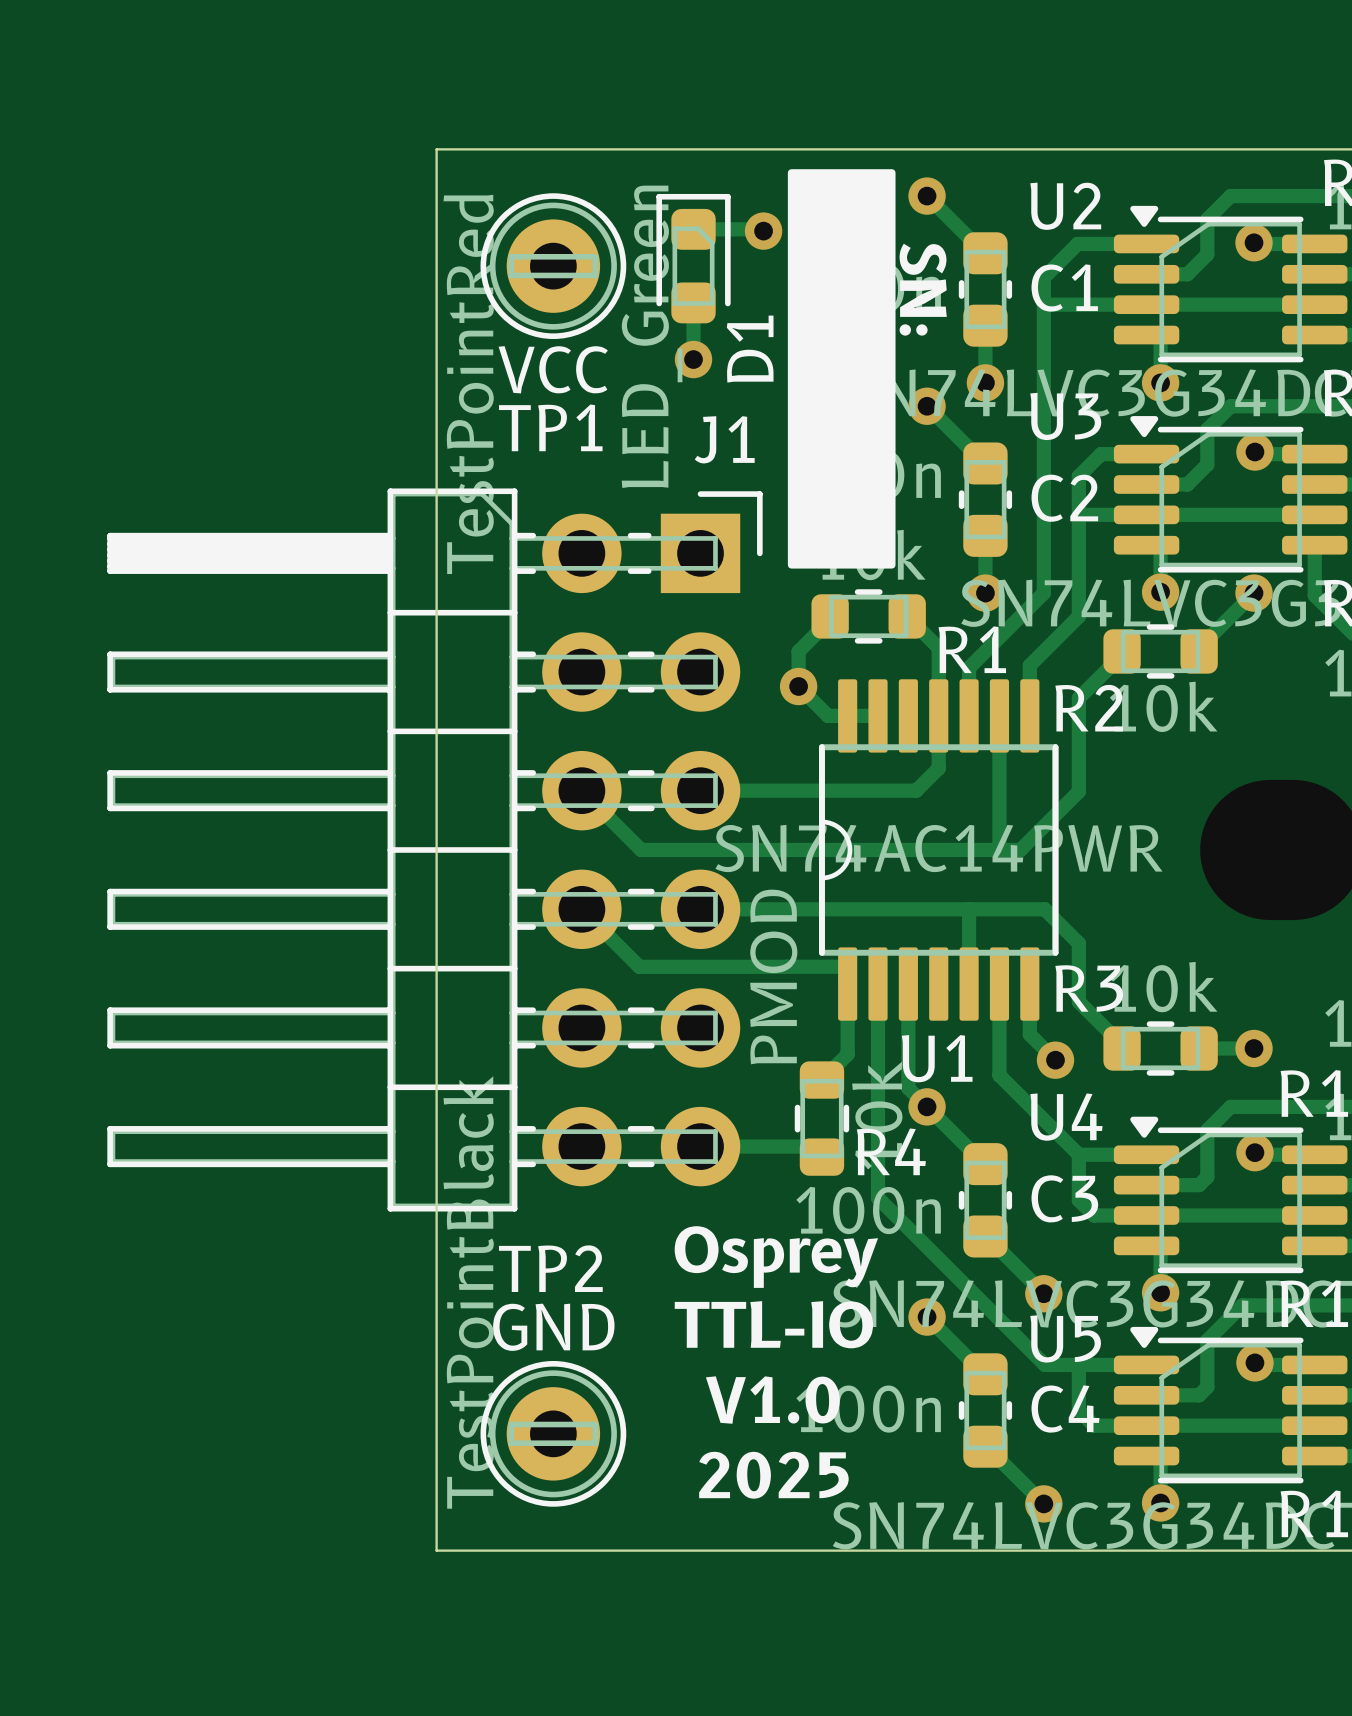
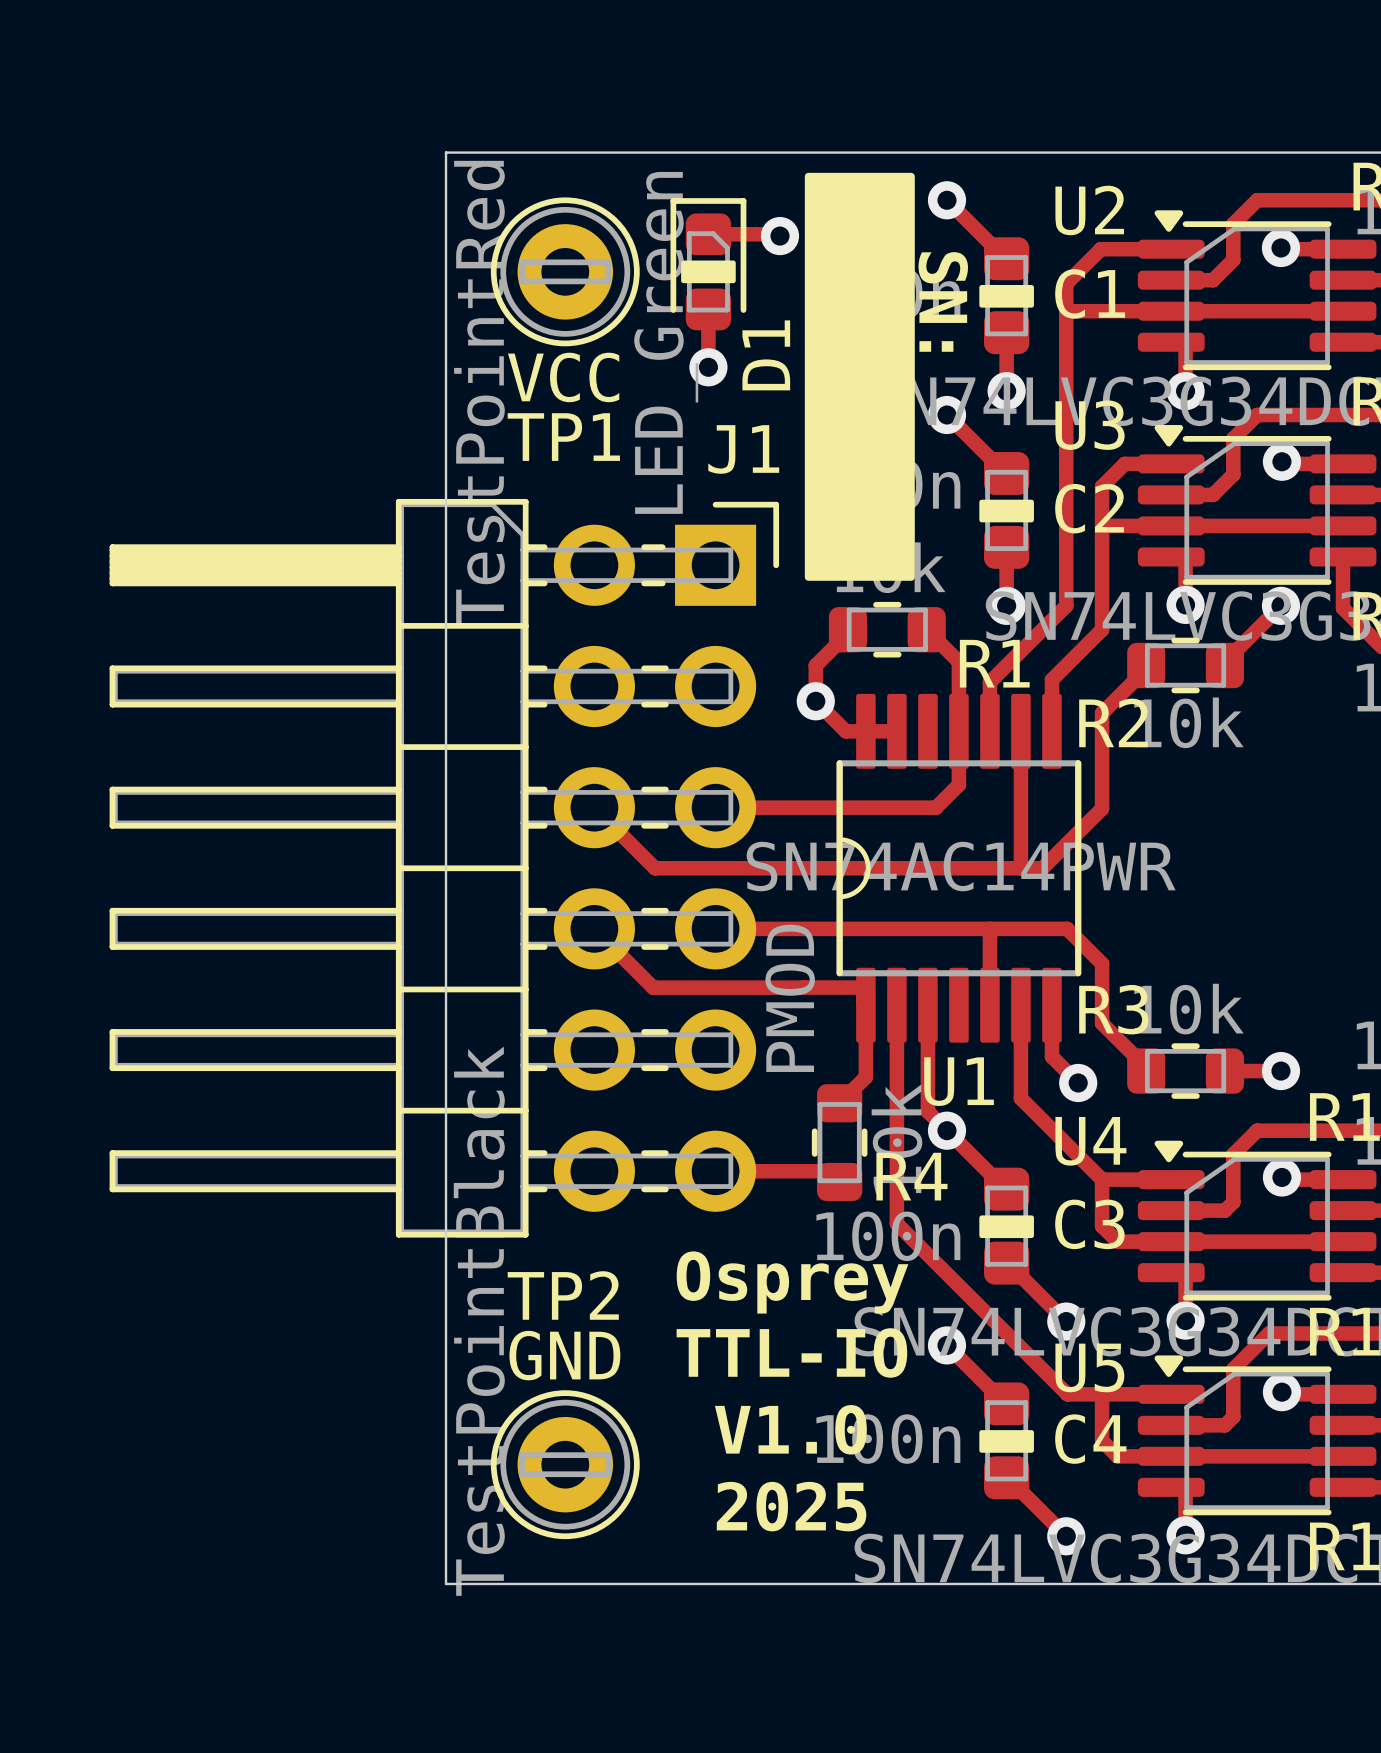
D1 footprint: [656, 193, 731, 324] -> [670, 198, 747, 331]
C1 footprint: [958, 232, 1013, 347] -> [979, 237, 1034, 355]
C2 footprint: [958, 442, 1013, 557] -> [979, 451, 1034, 569]
C3 footprint: [958, 1143, 1013, 1258] -> [979, 1167, 1034, 1285]
C4 footprint: [958, 1353, 1013, 1468] -> [979, 1382, 1034, 1500]

